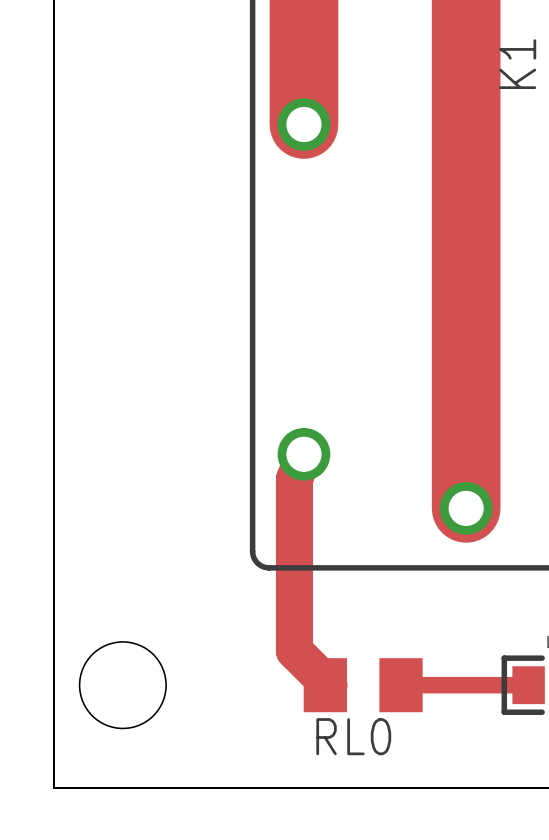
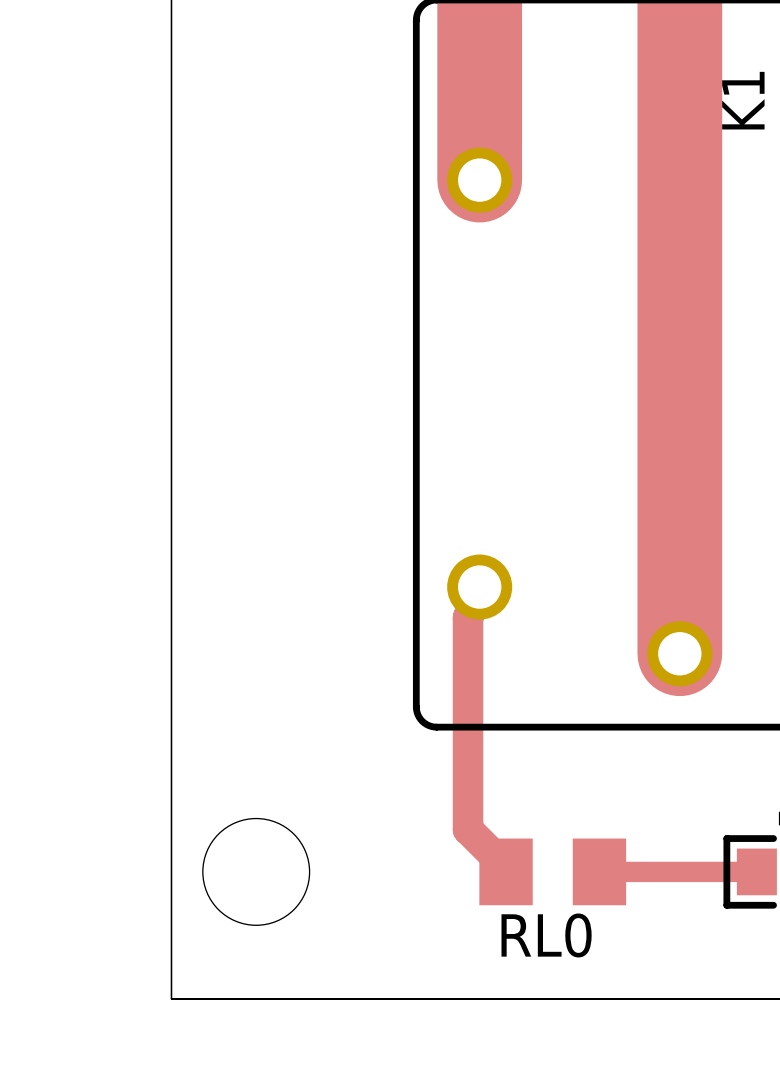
track width: thick (303, 454) (294, 479) (294, 650) (328, 685) (325, 685) -> thin (479, 587) (468, 617) (468, 829) (510, 871) (506, 871)

